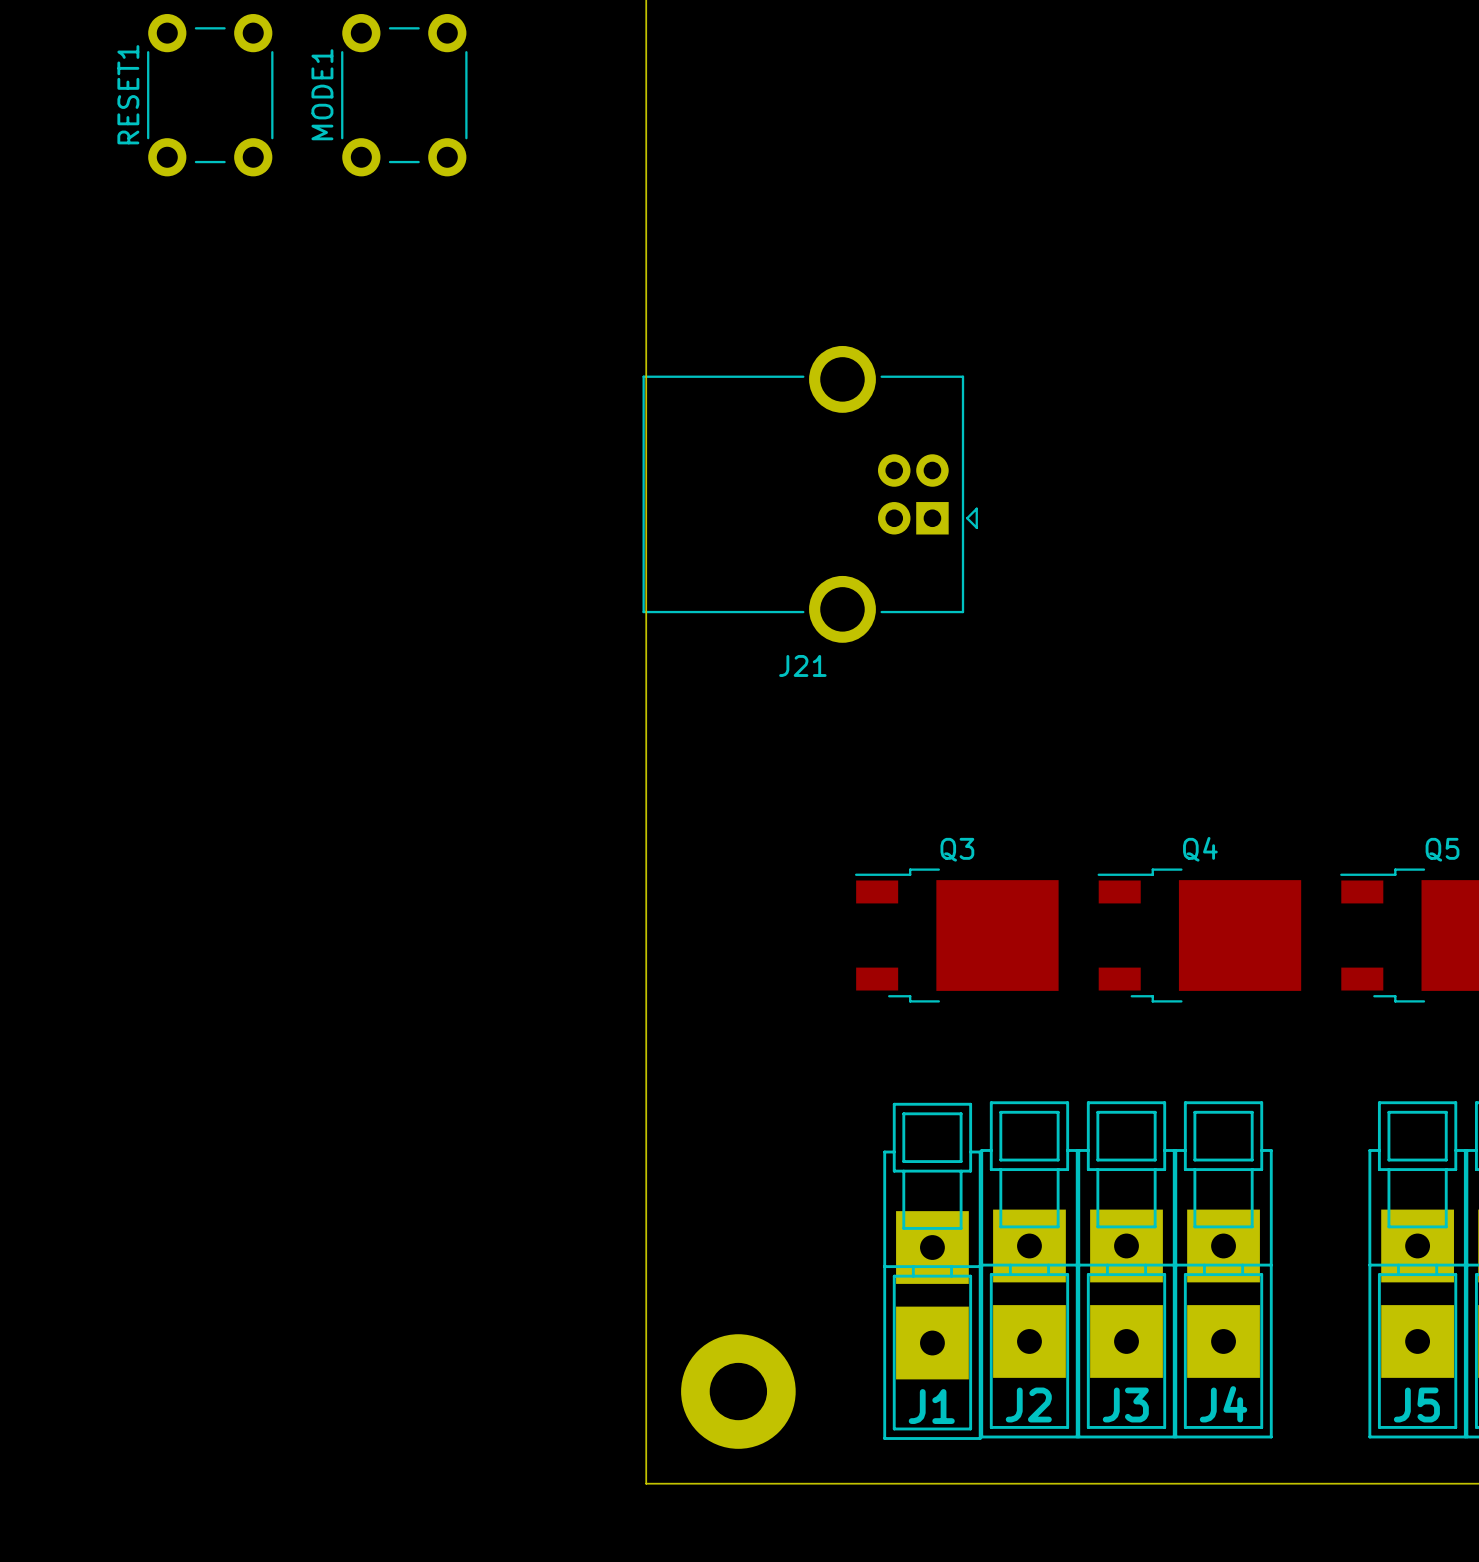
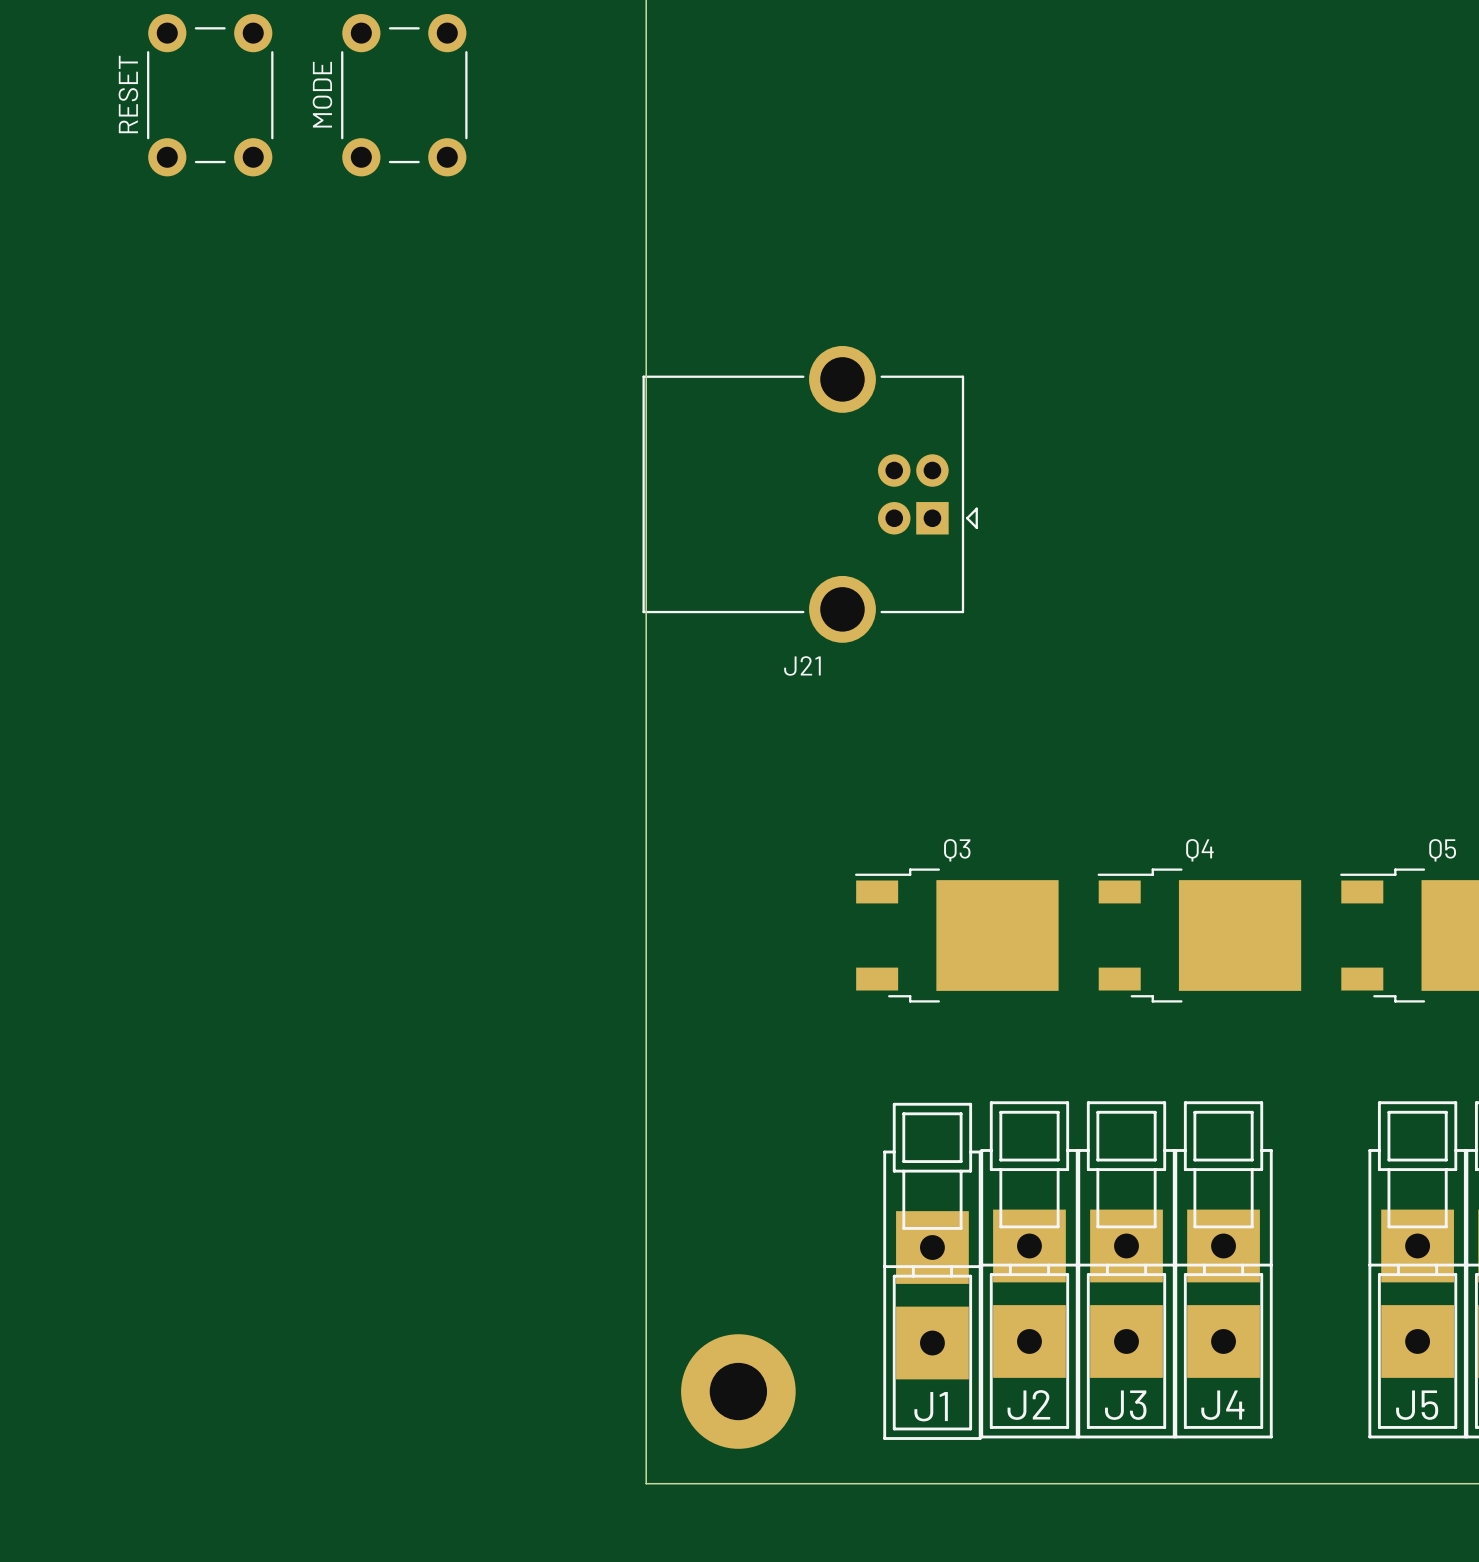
RESET1 name: RESET1 (128, 94) -> RESET (128, 94)
MODE1 name: MODE1 (322, 94) -> MODE (322, 94)

